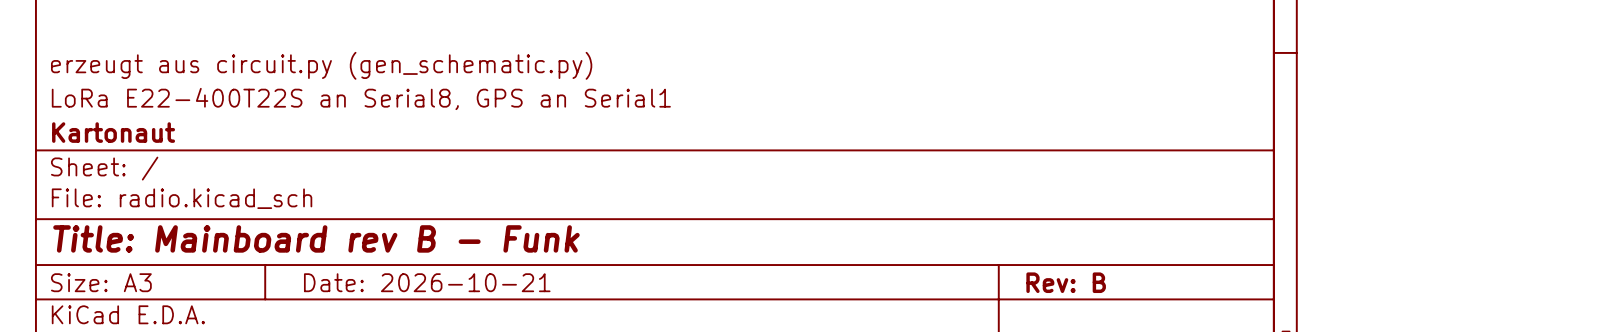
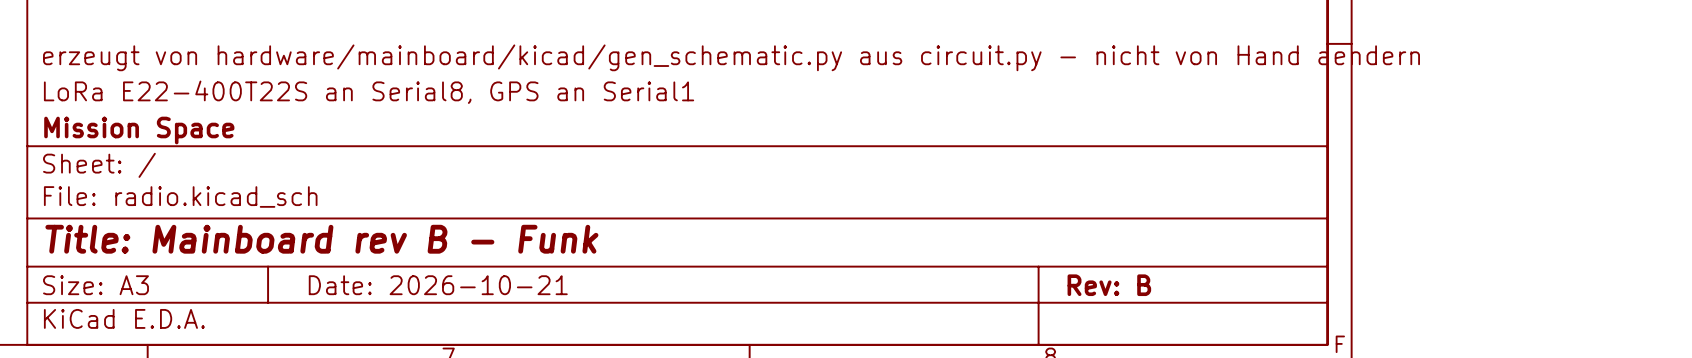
title block: erzeugt aus circuit.py (gen_schematic.py) (321, 65) -> erzeugt von hardware/mainboard/kicad/gen_schematic.py aus circuit.py - nicht von Hand aendern (731, 57)
title block: Kartonaut (113, 132) -> Mission Space (139, 130)

